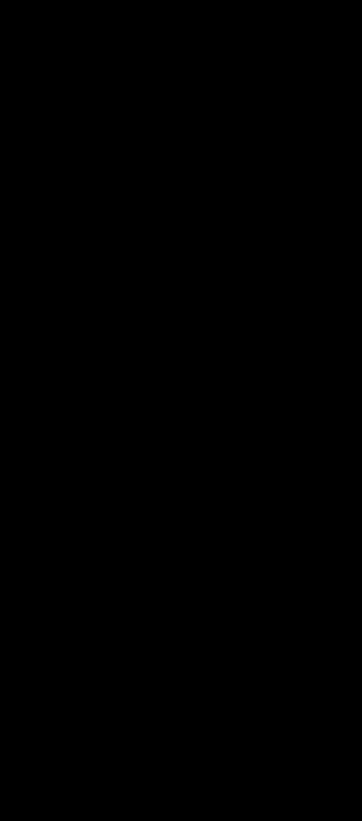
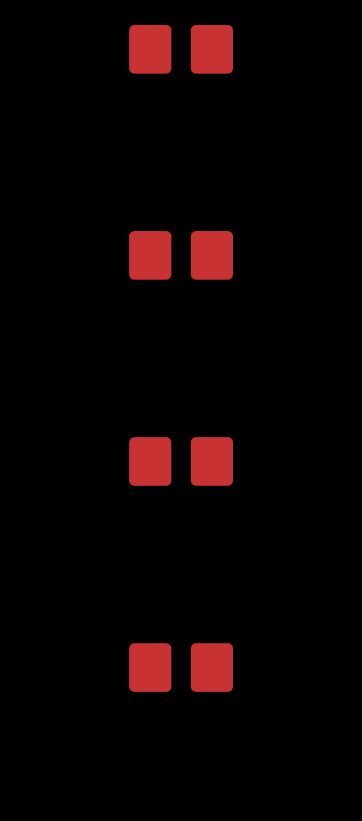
part: none -> (181, 49)
part: none -> (181, 255)
part: none -> (181, 461)
part: none -> (181, 667)

